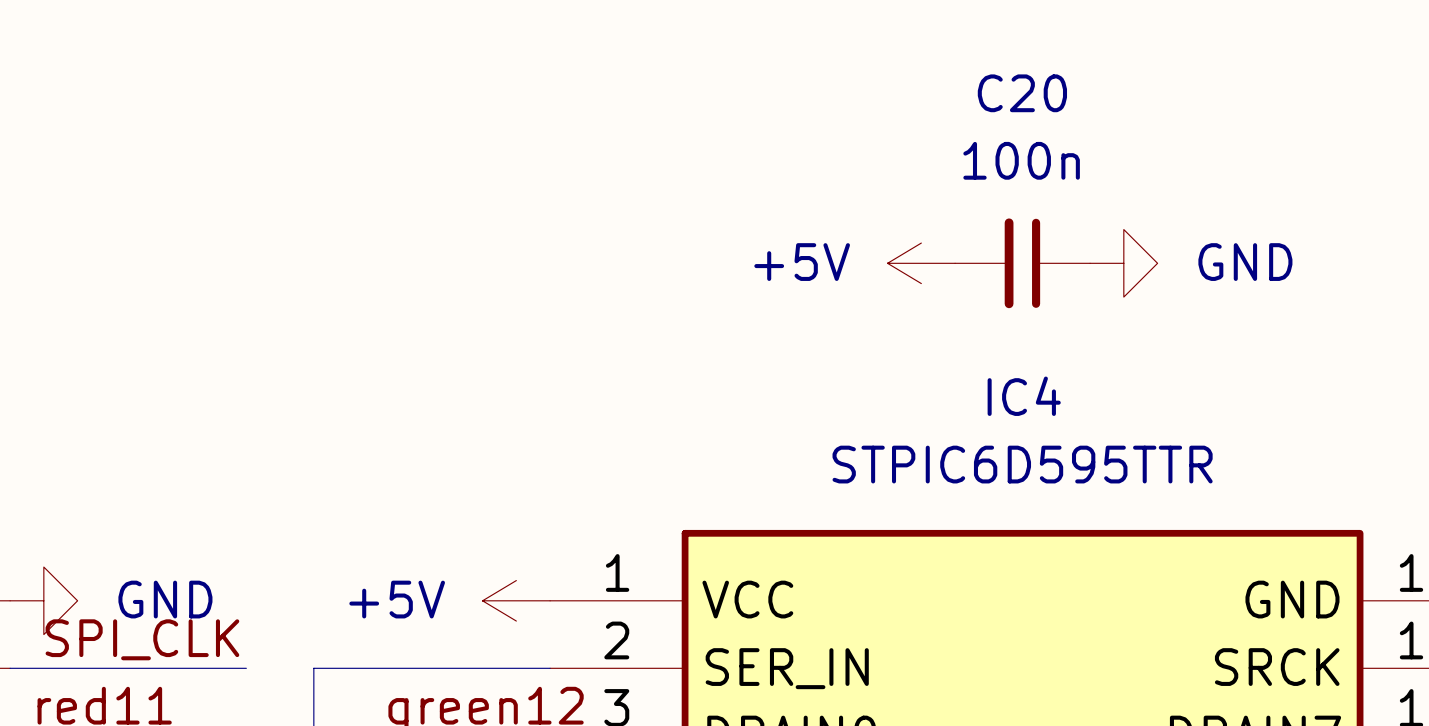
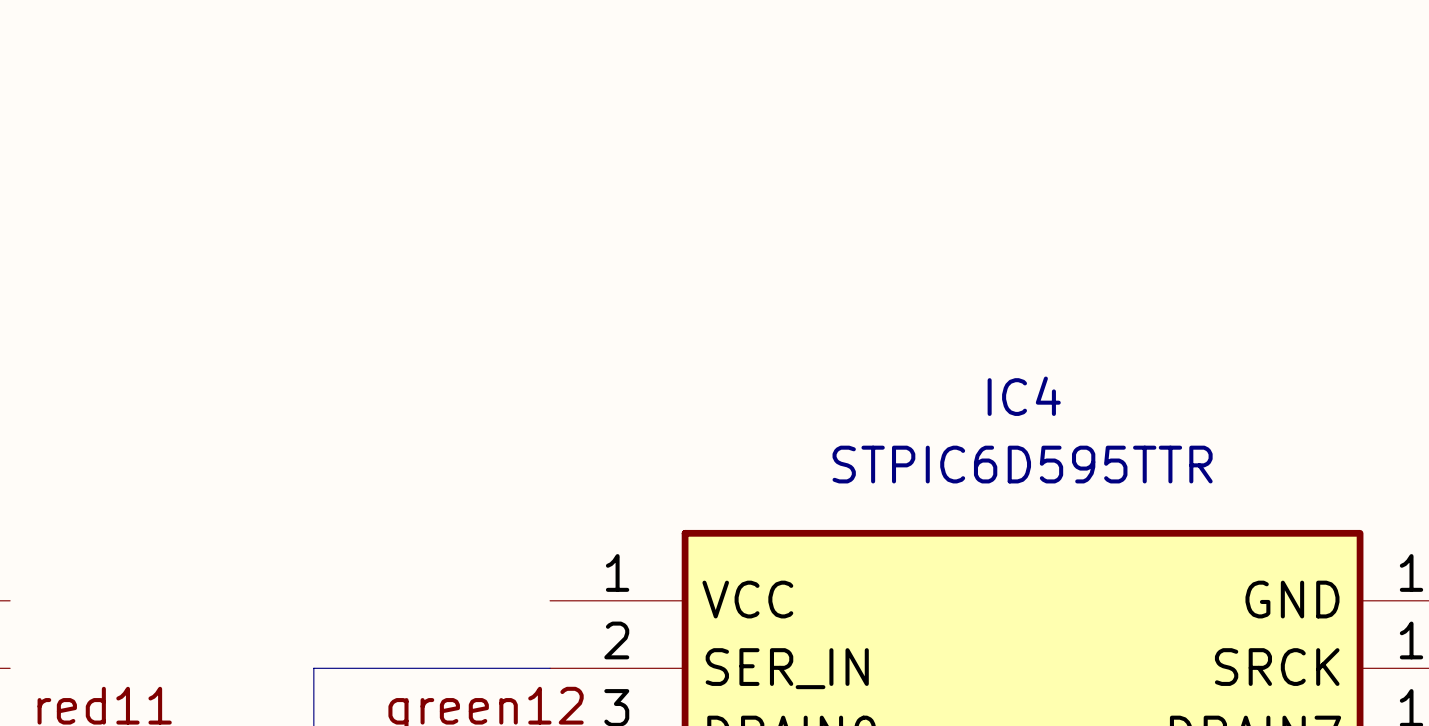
power symbol: +5V (921, 263) -> none
C20: 100n (1022, 263) -> none
power symbol: GND (1123, 263) -> none
power symbol: GND (43, 600) -> none
power symbol: +5V (516, 600) -> none
label: SPI_CLK (142, 639) -> none
wire: (10, 668) (246, 668) -> none

